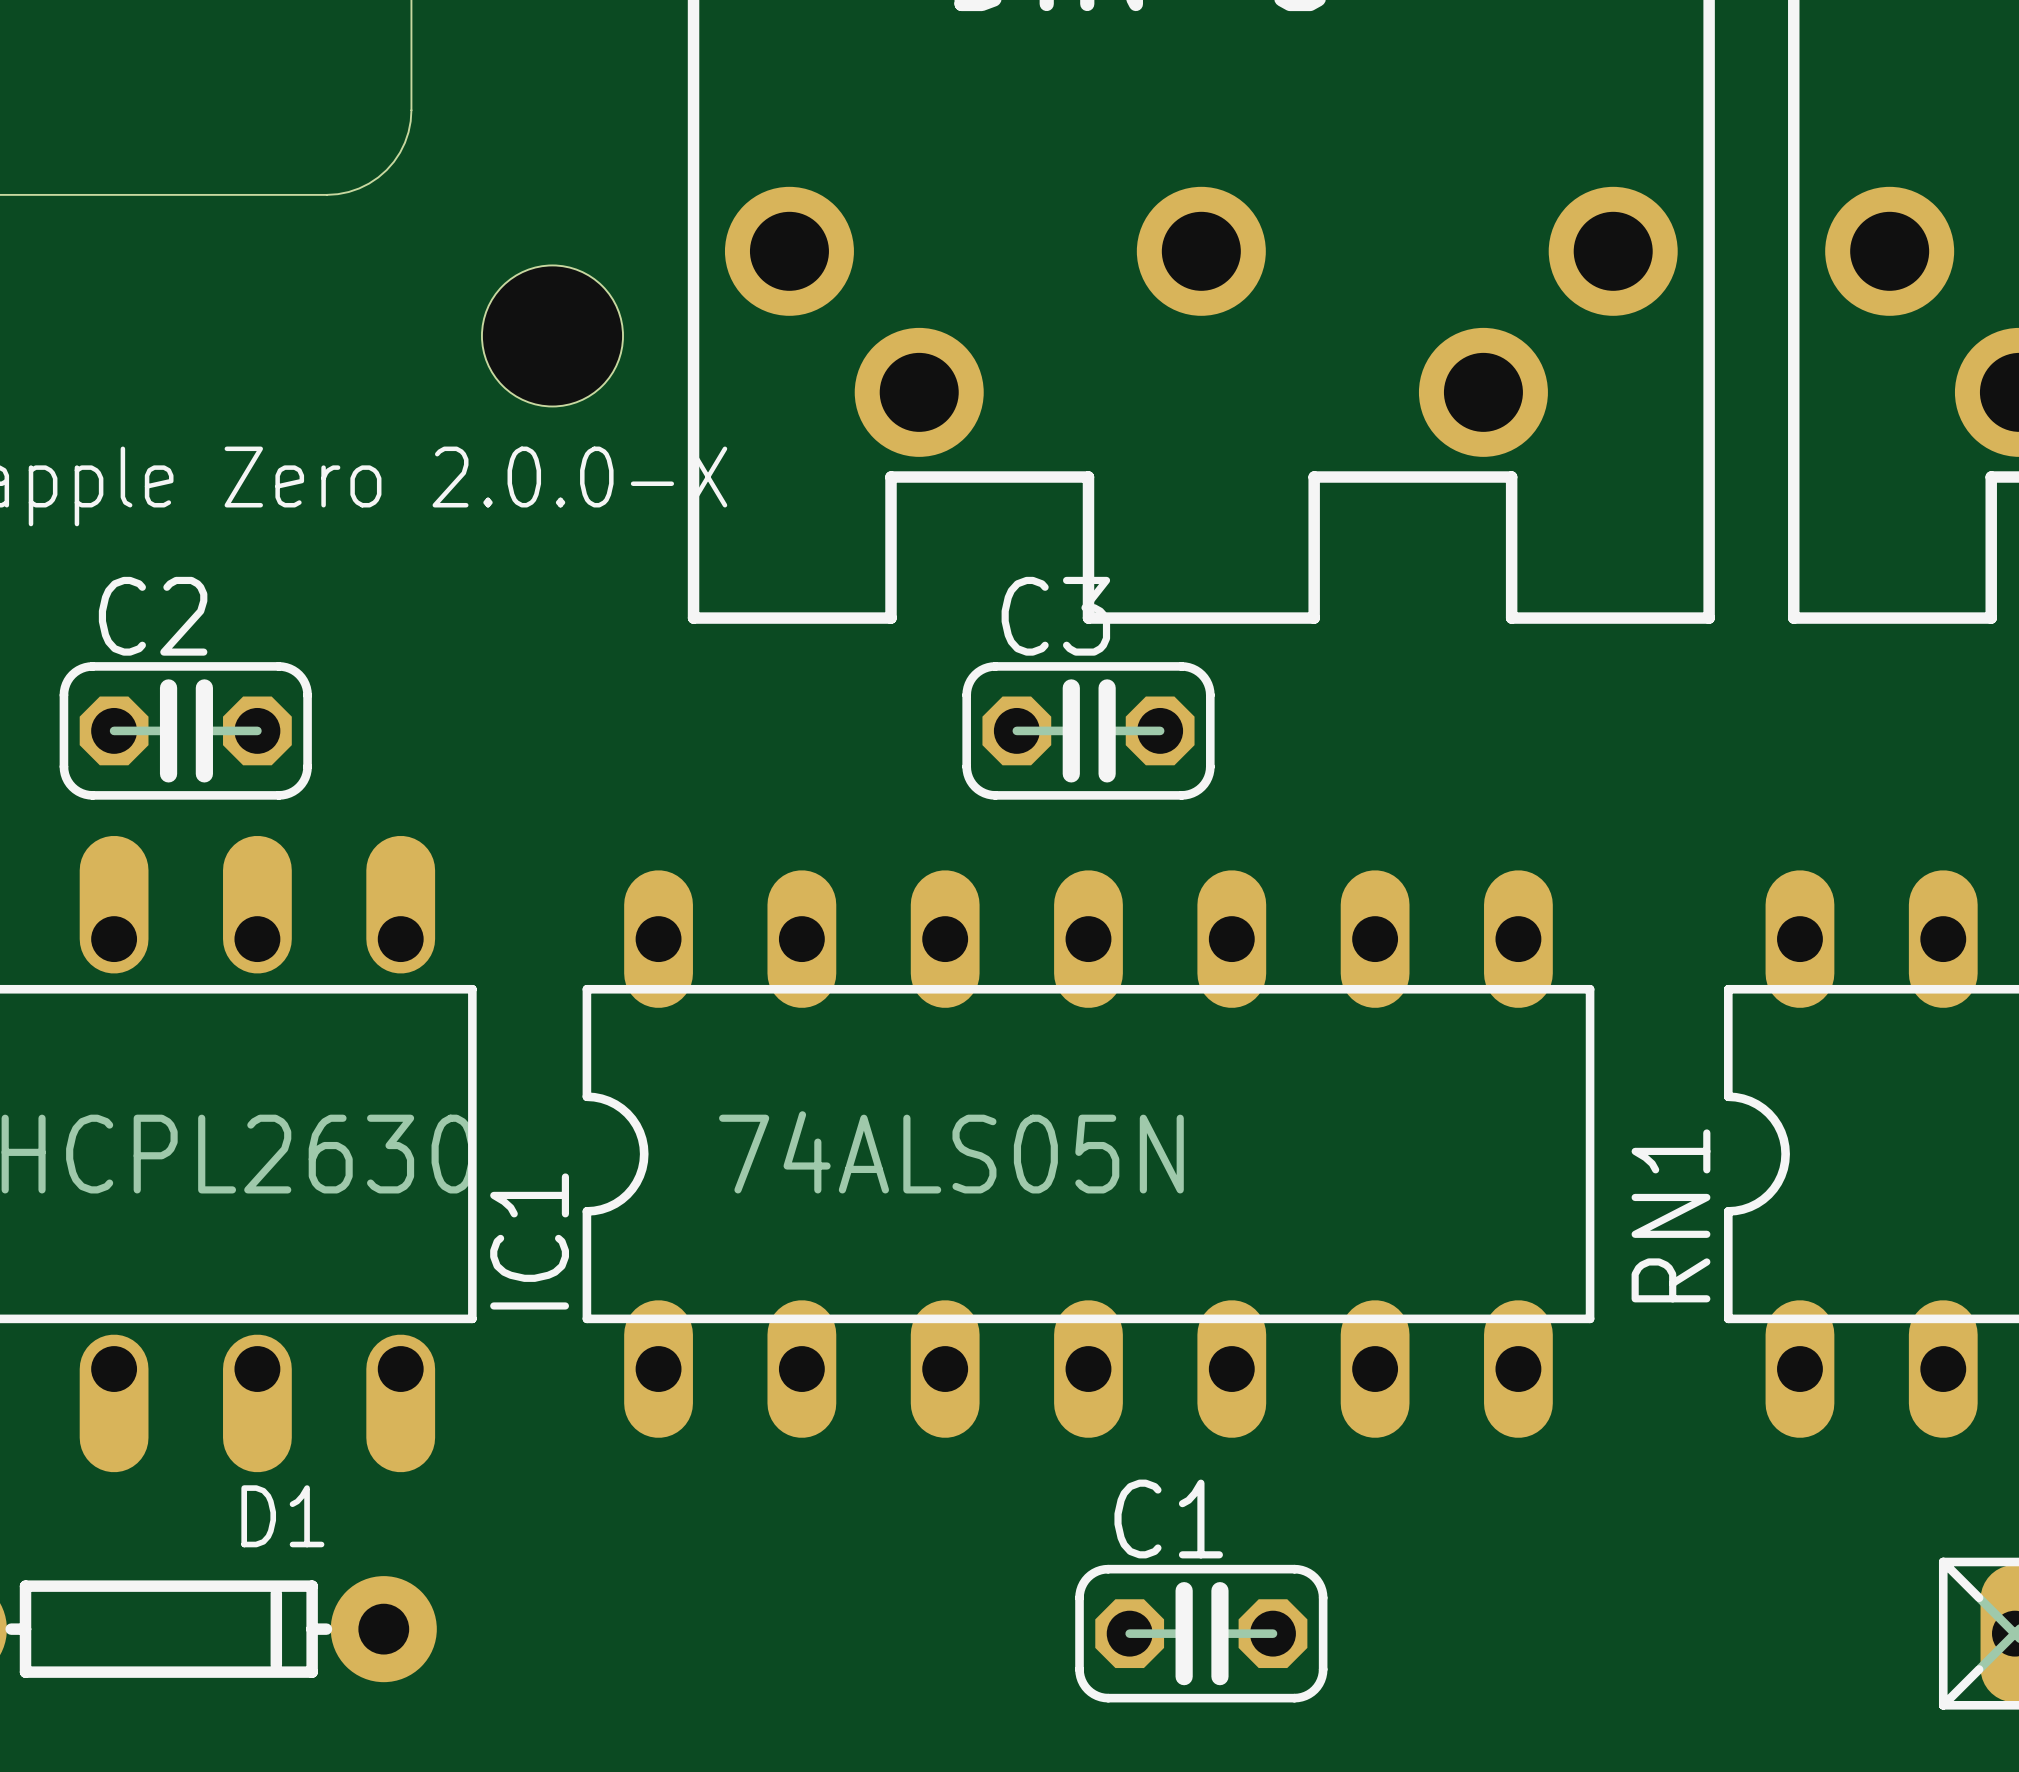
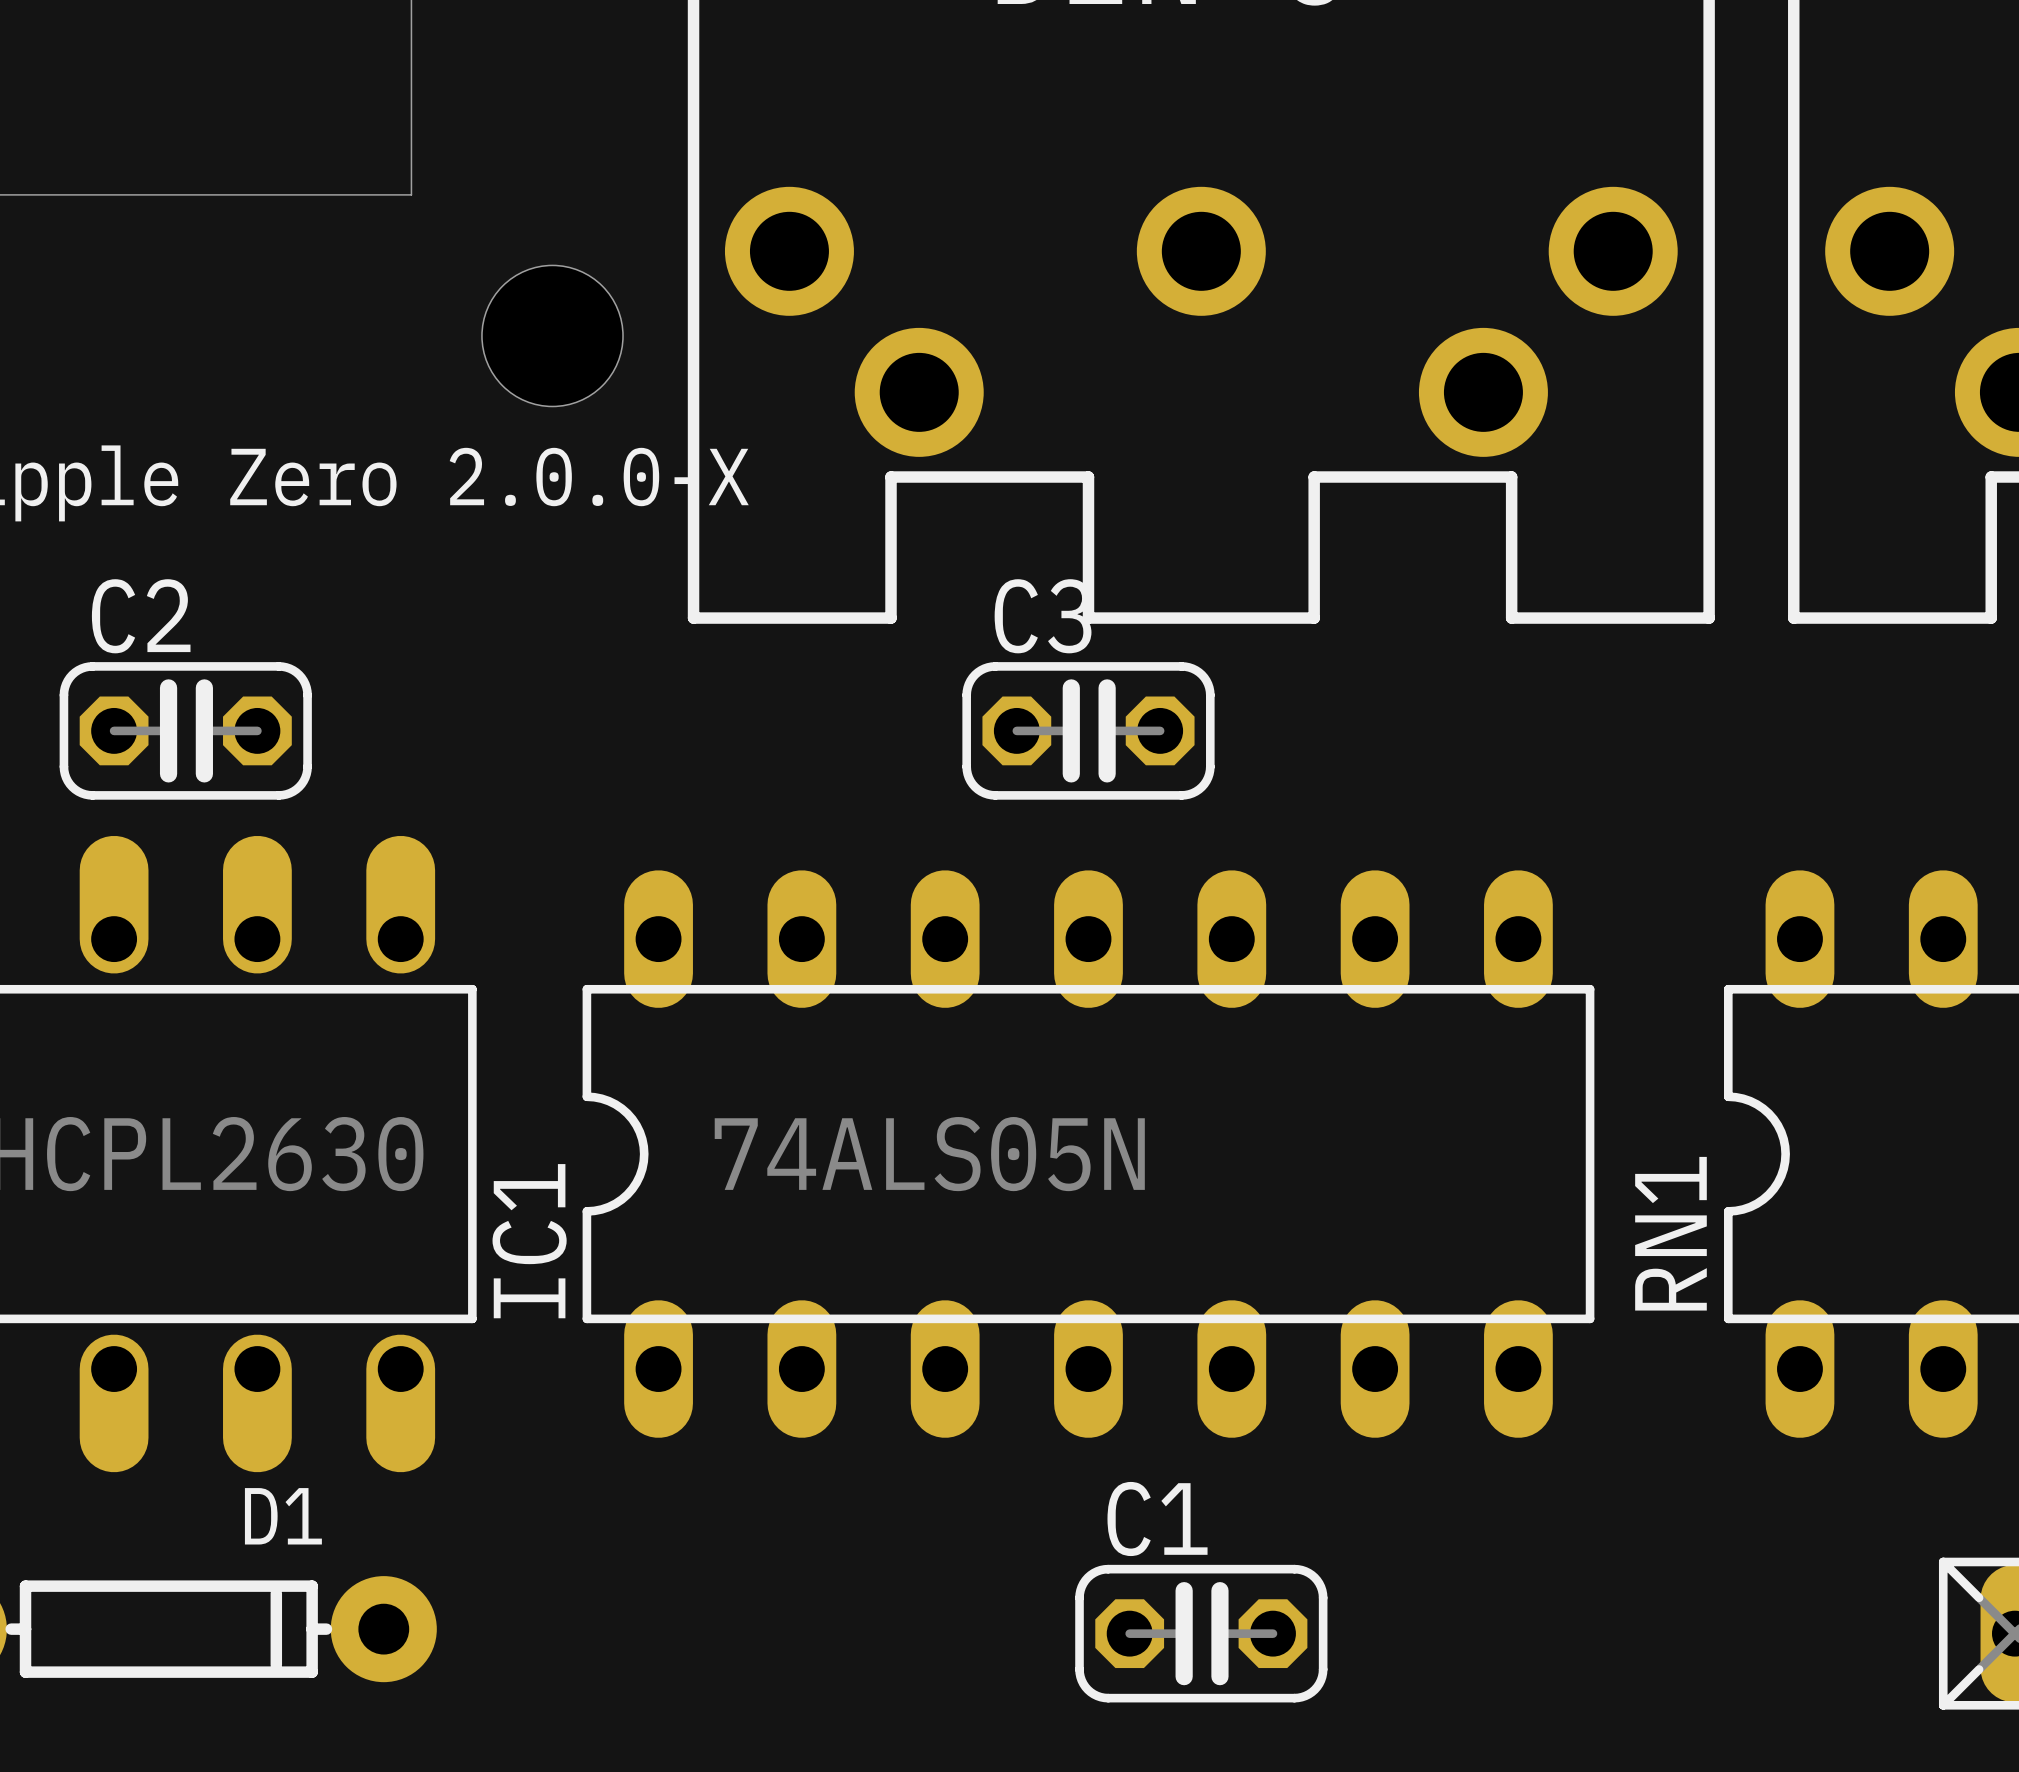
board edge: (411, 110) (404, 142) (386, 170) (359, 188) (326, 194) -> (411, 110) (411, 194) (326, 194)

